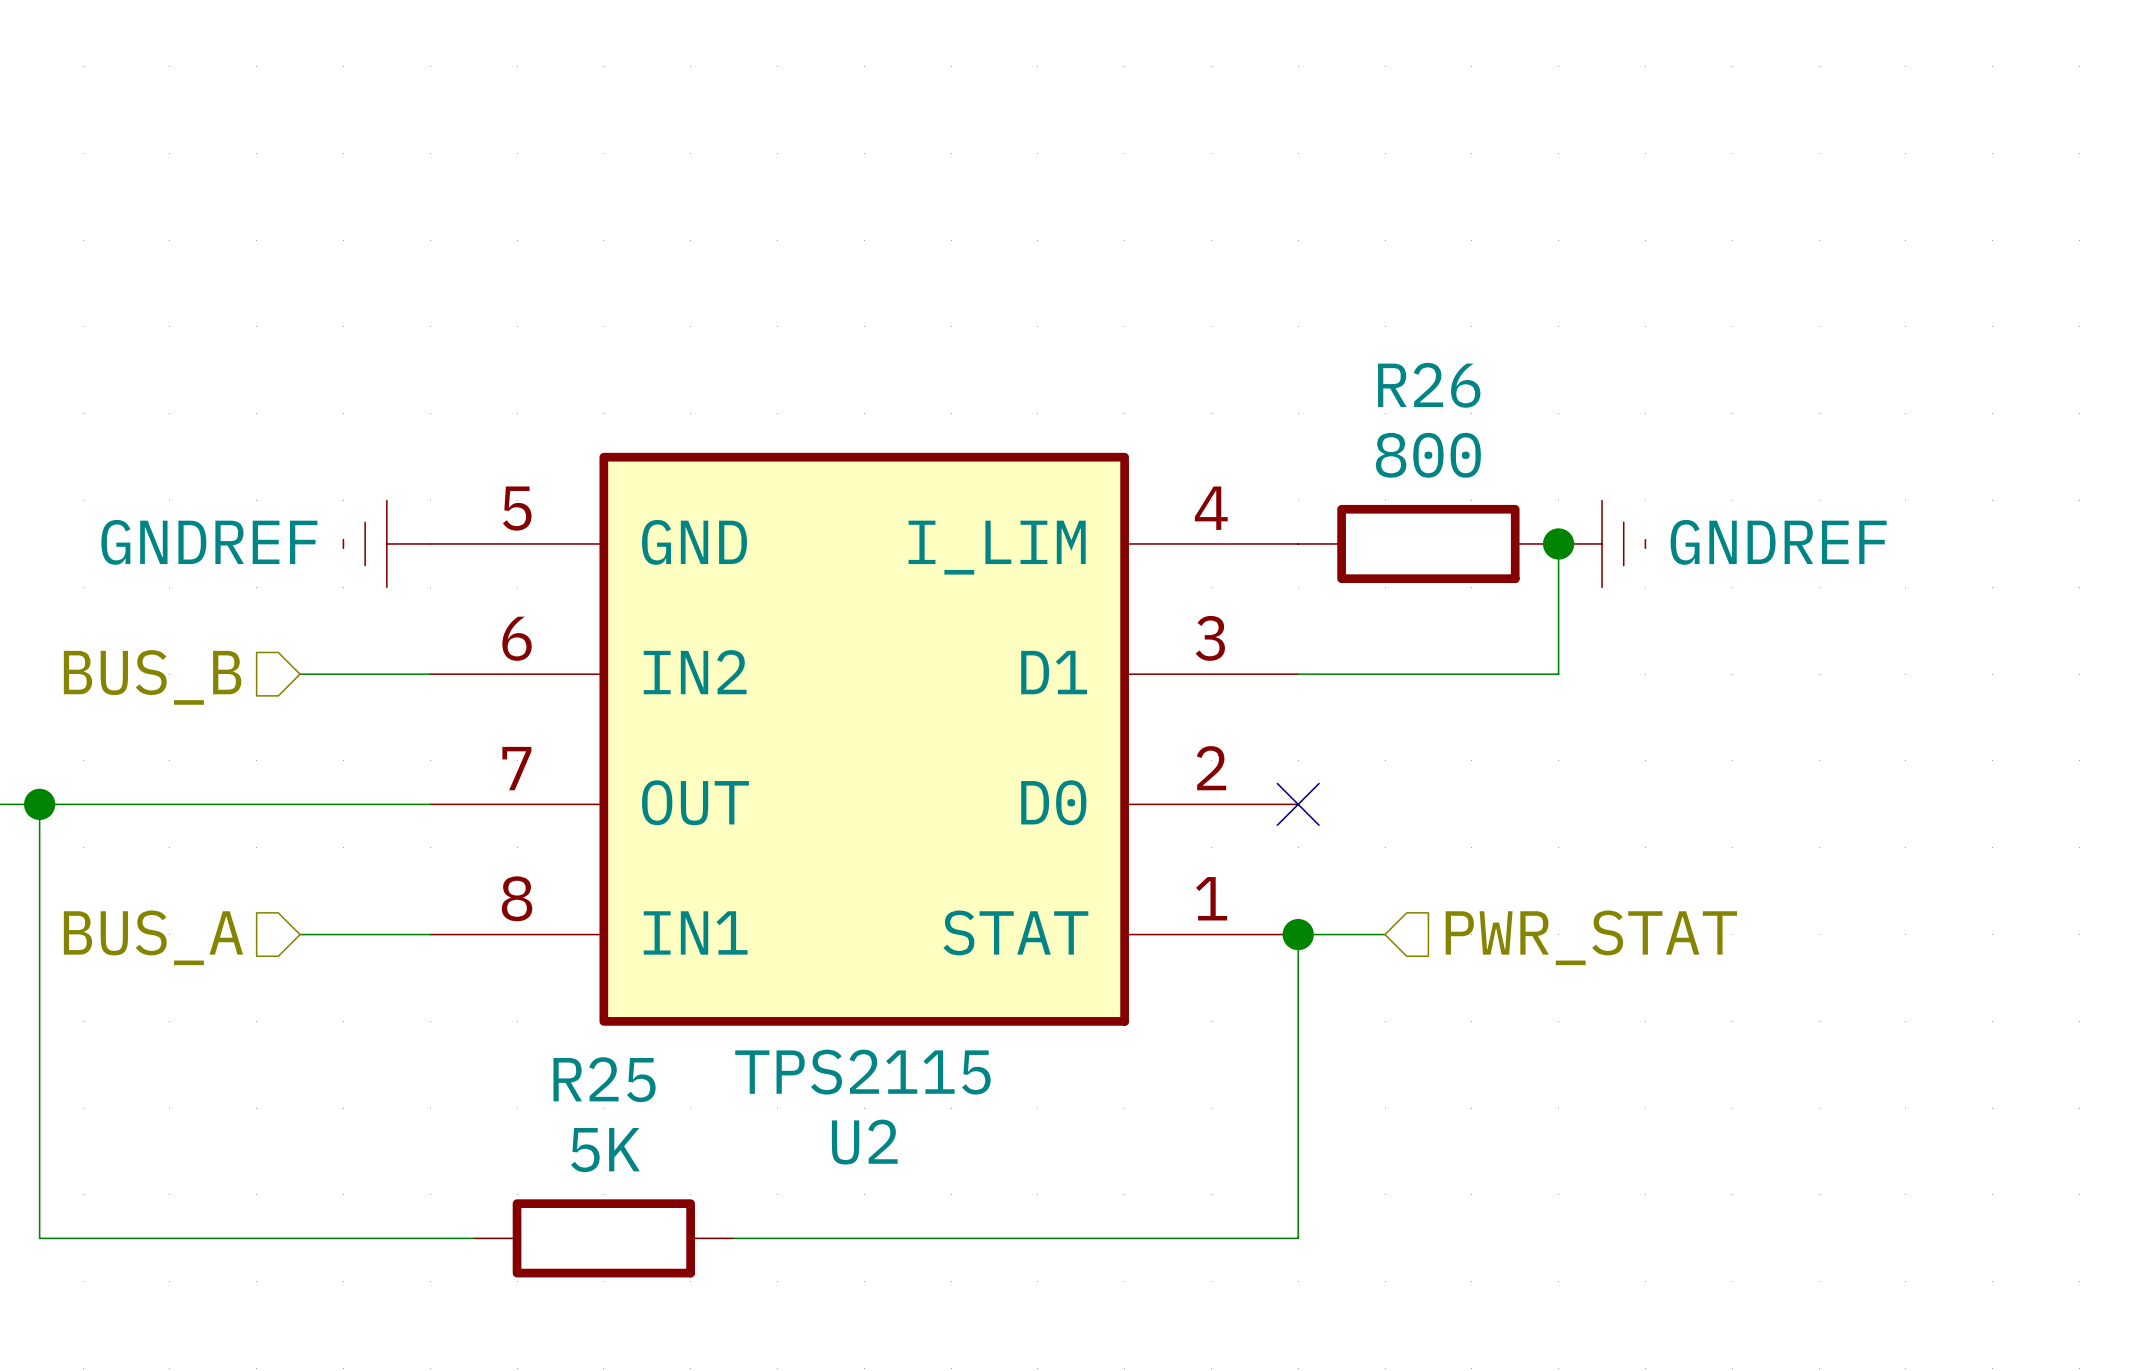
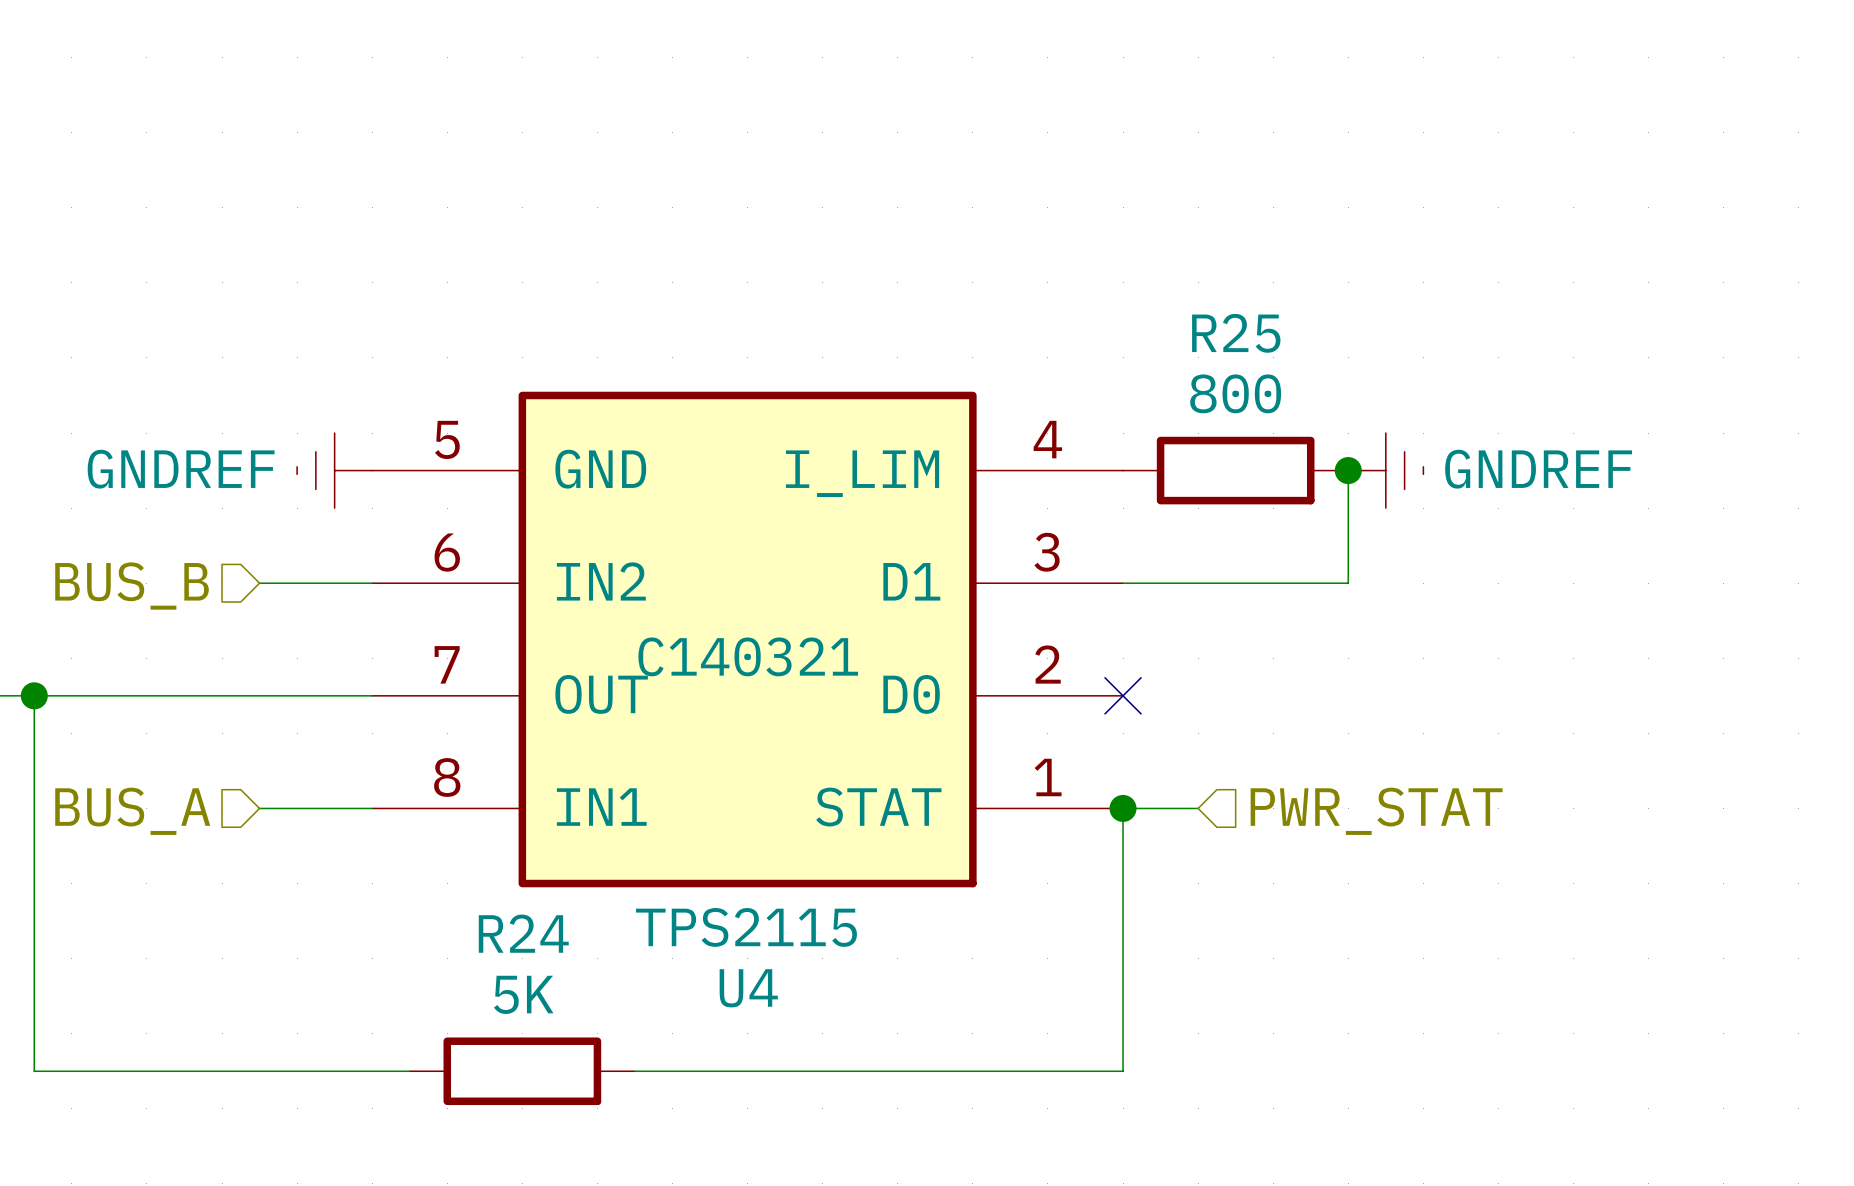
R26 name: R26 (1429, 385) -> R25 (1236, 333)
U2 text: none -> C140321 (748, 656)
R25 name: R25 (604, 1079) -> R24 (523, 933)
U2 name: U2 (864, 1142) -> U4 (748, 988)

